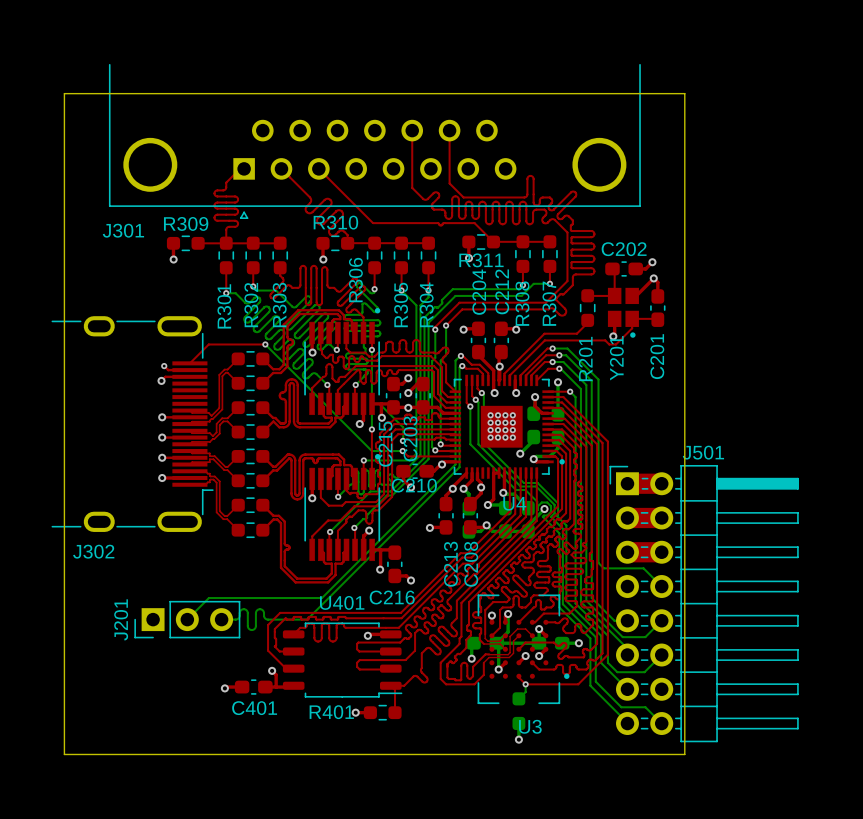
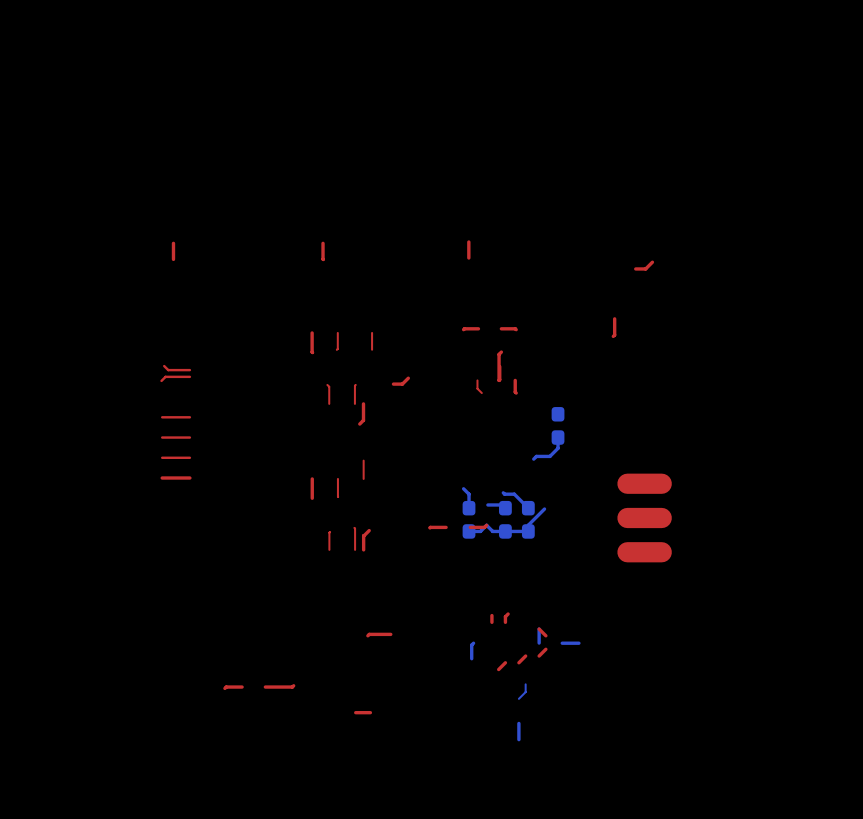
board edge: (64, 93) (684, 93) (684, 754) (64, 754) (64, 93) -> none
top track: (412, 130) (412, 187) (424, 199) (434, 192) (438, 192) (438, 197) (431, 207) (433, 209) (444, 210) (446, 218) (451, 216) (452, 198) (455, 196) (458, 198) (458, 215) (460, 218) (465, 216) (465, 204) (469, 201) (472, 204) (472, 216) (477, 218) (479, 203) (483, 201) (485, 204) (486, 222) (490, 223) (492, 221) (492, 204) (496, 201) (499, 204) (499, 222) (503, 224) (506, 221) (506, 204) (509, 201) (512, 204) (513, 222) (516, 224) (519, 221) (519, 204) (523, 201) (526, 204) (527, 223) (532, 222) (534, 210) (544, 209) (546, 213) (542, 218) (543, 222) (546, 223) (553, 219) (567, 232) (567, 281) (545, 302) (459, 302) (435, 326) (435, 329) -> none
top track: (449, 130) (449, 183) (463, 197) (525, 197) (527, 194) (527, 178) (530, 175) (533, 178) (533, 202) (535, 205) (539, 204) (541, 197) (549, 197) (552, 201) (548, 208) (552, 210) (571, 192) (575, 192) (575, 196) (557, 216) (560, 219) (567, 215) (572, 220) (571, 230) (593, 232) (592, 237) (571, 237) (571, 243) (591, 243) (594, 246) (591, 249) (571, 249) (571, 255) (591, 255) (594, 258) (591, 262) (571, 262) (571, 267) (591, 268) (594, 271) (592, 274) (574, 274) (572, 285) (556, 298) (565, 310) (563, 315) (551, 308) (462, 309) (446, 325) -> none
J301: (374, 141) -> none
top track: (244, 168) (240, 168) (226, 182) (225, 189) (216, 190) (214, 192) (216, 196) (235, 196) (237, 198) (235, 202) (217, 202) (214, 204) (216, 208) (235, 208) (237, 210) (235, 214) (217, 214) (214, 216) (216, 220) (235, 220) (237, 222) (236, 226) (226, 228) (226, 243) -> none
top track: (281, 168) (310, 198) (310, 202) (305, 208) (307, 212) (312, 212) (325, 199) (330, 200) (330, 205) (317, 218) (318, 224) (323, 223) (337, 210) (342, 211) (342, 216) (329, 229) (329, 232) (333, 235) (339, 230) (343, 231) (347, 235) (347, 243) -> none
top track: (318, 168) (373, 223) (437, 223) (440, 225) (443, 223) (474, 223) (493, 241) -> none
R311: (481, 241) -> none
top track: (493, 241) (549, 241) -> none
R309: (185, 243) -> none
top track: (198, 243) (280, 243) -> none
R310: (335, 243) -> none
top track: (347, 243) (428, 243) -> none
R308: (522, 254) -> none
R307: (549, 254) -> none
R301: (226, 255) -> none
R302: (253, 255) -> none
R303: (280, 255) -> none
R306: (374, 255) -> none
R305: (401, 255) -> none
R304: (428, 255) -> none
via: (469, 258) -> none
via: (173, 259) -> none
via: (323, 259) -> none
via: (652, 262) -> none
top track: (522, 266) (522, 285) -> none
top track: (549, 266) (549, 283) -> none
top track: (226, 267) (226, 293) -> none
top track: (253, 267) (253, 286) -> none
top track: (280, 267) (280, 275) (283, 280) (270, 294) (270, 297) (274, 297) (287, 285) (292, 287) (299, 287) (300, 268) (303, 265) (305, 268) (305, 302) (308, 305) (311, 302) (312, 266) (316, 268) (316, 302) (318, 305) (321, 302) (323, 267) (327, 269) (327, 286) (334, 287) (338, 291) (353, 279) (356, 279) (356, 282) (337, 303) (341, 305) (360, 286) (364, 286) (364, 290) (346, 309) (348, 312) (355, 309) (363, 317) (363, 332) -> none
top track: (374, 267) (374, 289) -> none
top track: (401, 267) (401, 290) -> none
top track: (428, 267) (428, 290) -> none
top track: (612, 268) (614, 271) (614, 295) (587, 295) -> none
C202: (624, 268) -> none
via: (653, 278) -> none
bottom track: (549, 283) (533, 283) (521, 295) (455, 295) (428, 322) (428, 459) (392, 495) (386, 495) (366, 515) (365, 519) (363, 519) (354, 527) -> none
via: (549, 283) -> none
bottom track: (522, 285) (518, 289) (452, 289) (442, 300) (442, 303) (438, 307) (434, 307) (424, 317) (424, 457) (390, 491) (370, 491) (330, 531) -> none
via: (522, 285) -> none
bottom track: (253, 286) (257, 290) (276, 290) (293, 307) (306, 296) (309, 296) (310, 301) (286, 324) (286, 328) (291, 329) (314, 305) (317, 305) (319, 309) (295, 333) (294, 336) (299, 337) (323, 314) (326, 313) (327, 318) (303, 344) (308, 346) (334, 321) (336, 326) (317, 347) (321, 349) (329, 344) (336, 349) -> none
via: (253, 286) -> none
bottom track: (374, 289) (374, 291) (371, 293) (360, 283) (356, 284) (377, 307) (377, 311) (374, 311) (364, 303) (361, 314) (346, 314) (344, 317) (346, 320) (377, 320) (380, 321) (378, 325) (347, 325) (344, 327) (346, 330) (377, 331) (380, 332) (378, 336) (363, 337) (365, 353) (346, 354) (347, 358) (365, 358) (367, 360) (365, 364) (347, 364) (346, 368) (363, 369) -> none
via: (374, 289) -> none
bottom track: (401, 290) (416, 305) (416, 453) (409, 460) (363, 460) -> none
via: (401, 290) -> none
bottom track: (428, 290) (428, 297) (420, 305) (420, 455) (397, 477) (388, 475) (390, 484) (380, 483) (379, 472) (376, 470) (374, 472) (374, 486) (369, 486) (369, 472) (365, 470) (363, 492) (361, 494) (358, 492) (358, 472) (354, 470) (352, 483) (338, 496) -> none
via: (428, 290) -> none
via: (226, 293) -> none
bottom track: (227, 293) (235, 293) (247, 303) (255, 297) (259, 297) (259, 302) (244, 317) (244, 321) (249, 322) (264, 307) (268, 307) (269, 311) (254, 326) (254, 330) (258, 331) (273, 316) (278, 316) (278, 321) (266, 333) (266, 338) (270, 339) (279, 330) (283, 330) (284, 334) (274, 344) (274, 348) (279, 349) (289, 339) (292, 339) (293, 344) (284, 354) (284, 358) (288, 359) (298, 349) (302, 349) (303, 353) (293, 363) (294, 367) (298, 368) (307, 359) (311, 359) (312, 363) (303, 373) (303, 376) (307, 378) (315, 373) (327, 384) -> none
top track: (632, 295) (636, 295) (653, 278) (657, 282) (657, 296) -> none
R201: (587, 308) -> none
C201: (657, 308) -> none
Y201: (623, 312) -> none
top track: (657, 319) (632, 318) (632, 328) (616, 344) (609, 344) (605, 340) (544, 340) (509, 375) (509, 380) -> none
top track: (587, 320) (587, 322) (576, 333) (544, 333) (504, 373) (504, 380) -> none
bottom track: (446, 325) (446, 355) (440, 360) (440, 444) -> none
via: (446, 325) -> none
bottom track: (435, 329) (435, 357) (432, 361) (432, 447) (435, 450) -> none
via: (435, 329) -> none
via: (463, 329) -> none
via: (516, 329) -> none
top track: (320, 332) (322, 353) (326, 357) (332, 354) (333, 360) (335, 362) (339, 356) (343, 357) -> none
top track: (329, 332) (332, 329) (332, 320) (340, 319) (337, 313) (299, 313) (287, 326) (287, 337) (292, 342) (287, 347) (287, 366) (280, 372) (273, 372) (262, 383) -> none
top track: (346, 332) (346, 348) (350, 352) (365, 352) (369, 356) (374, 356) (378, 352) (384, 351) (388, 341) (392, 343) (393, 350) (397, 352) (399, 342) (402, 339) (405, 341) (406, 349) (408, 352) (412, 351) (413, 342) (416, 339) (419, 341) (419, 349) (422, 352) (437, 353) (443, 347) (446, 347) (448, 351) (442, 359) (446, 364) (446, 382) (455, 391) -> none
top track: (354, 332) (351, 329) (351, 320) (343, 319) (343, 315) (338, 310) (298, 310) (283, 324) (283, 364) (279, 369) (273, 369) (262, 358) -> none
via: (613, 336) -> none
C204: (478, 340) -> none
C212: (501, 340) -> none
top track: (265, 344) (208, 344) (189, 363) -> none
bottom track: (265, 344) (371, 451) (402, 451) -> none
via: (265, 344) -> none
top track: (552, 348) (547, 348) (520, 375) (520, 380) -> none
bottom track: (552, 348) (567, 348) (598, 379) (598, 562) (603, 568) (643, 568) (661, 586) -> none
via: (552, 348) -> none
via: (336, 349) -> none
bottom track: (371, 349) (371, 429) -> none
via: (371, 349) -> none
via: (312, 352) -> none
top track: (478, 352) (478, 355) (493, 370) (494, 393) -> none
top track: (460, 355) (471, 364) (479, 364) (488, 373) (488, 380) -> none
bottom track: (460, 355) (455, 360) (455, 464) (322, 598) (208, 598) (187, 619) -> none
via: (460, 355) -> none
top track: (559, 355) (546, 355) (526, 375) (526, 380) -> none
bottom track: (559, 355) (566, 355) (591, 380) (591, 598) (614, 620) (627, 620) -> none
via: (559, 355) -> none
top track: (343, 357) (343, 366) (346, 368) (348, 367) (349, 358) (351, 356) (357, 362) (361, 356) (366, 360) (377, 360) (381, 356) (430, 356) (442, 367) (442, 391) (448, 397) (455, 397) -> none
top track: (238, 358) (219, 374) (219, 408) (211, 415) -> none
part: (250, 358) -> none
part: (342, 361) -> none
top track: (552, 362) (544, 362) (531, 375) (531, 380) -> none
bottom track: (552, 362) (563, 362) (586, 384) (586, 600) (622, 637) (645, 637) (661, 620) -> none
via: (552, 362) -> none
via: (164, 366) -> none
top track: (462, 366) (466, 368) (477, 368) (482, 373) (482, 380) -> none
bottom track: (462, 366) (459, 367) (459, 467) (307, 619) (267, 619) (264, 617) (263, 610) (259, 609) (256, 611) (255, 626) (252, 629) (248, 627) (247, 612) (244, 609) (240, 610) (237, 619) (221, 619) -> none
via: (462, 366) -> none
via: (499, 366) -> none
top track: (559, 368) (548, 368) (536, 380) -> none
bottom track: (559, 368) (580, 388) (580, 602) (627, 648) (627, 655) -> none
via: (559, 368) -> none
bottom track: (363, 369) (367, 370) (367, 374) (355, 384) -> none
via: (408, 378) -> none
via: (161, 380) -> none
top track: (466, 380) (466, 402) (470, 406) -> none
top track: (472, 380) (472, 396) (475, 399) -> none
bottom track: (558, 382) (558, 414) -> none
via: (558, 382) -> none
top track: (238, 383) (225, 372) (222, 376) (222, 409) (209, 421) (192, 421) (189, 424) -> none
part: (250, 383) -> none
via: (327, 384) -> none
via: (355, 384) -> none
top track: (423, 384) (417, 384) (408, 393) -> none
top track: (548, 391) (570, 391) -> none
bottom track: (570, 391) (575, 397) (575, 603) (607, 635) (607, 662) (617, 672) (644, 672) (661, 655) -> none
via: (570, 391) -> none
via: (408, 393) -> none
bottom track: (481, 393) (483, 395) (483, 442) (523, 482) (537, 482) (558, 503) (556, 515) (566, 525) (566, 601) (601, 635) (601, 662) (627, 689) -> none
via: (481, 393) -> none
via: (494, 393) -> none
via: (516, 393) -> none
C215: (393, 395) -> none
C203: (423, 395) -> none
top track: (535, 397) (535, 406) (542, 413) (548, 413) -> none
via: (535, 397) -> none
top track: (548, 397) (563, 397) (607, 441) (607, 654) (578, 684) (525, 684) (518, 676) -> none
bottom track: (475, 399) (478, 402) (478, 444) (520, 486) (536, 486) (554, 504) (554, 513) (550, 516) (562, 528) (562, 604) (595, 637) (595, 681) (621, 707) (645, 707) (661, 723) -> none
via: (475, 399) -> none
top track: (455, 402) (446, 402) (437, 393) (437, 370) (433, 366) (355, 366) (344, 376) (340, 377) (338, 381) (335, 381) (332, 378) (332, 366) (329, 364) (326, 366) (325, 375) (312, 388) (312, 403) -> none
top track: (548, 402) (562, 402) (602, 442) (602, 653) (595, 660) (590, 659) (587, 661) (588, 666) (586, 669) (578, 669) (575, 665) (570, 665) (567, 674) (563, 673) (561, 665) (557, 665) (554, 669) (539, 669) (532, 662) -> none
top track: (320, 403) (323, 407) (323, 415) (331, 417) (328, 423) (298, 423) (297, 384) (291, 379) (287, 381) (285, 390) (279, 394) (280, 398) (285, 401) (285, 422) (280, 423) (262, 407) -> none
top track: (337, 403) (337, 390) (357, 370) (360, 371) (360, 380) (363, 383) (365, 382) (365, 372) (368, 370) (371, 371) (371, 381) (373, 383) (376, 381) (376, 372) (378, 370) (384, 376) (389, 370) (395, 374) (399, 370) (431, 370) (433, 372) (433, 396) (445, 407) (455, 407) -> none
top track: (346, 403) (343, 407) (343, 415) (335, 417) (335, 421) (330, 427) (297, 426) (294, 422) (293, 384) (291, 383) (288, 424) (285, 427) (279, 427) (273, 421) (262, 432) -> none
bottom track: (371, 403) (379, 403) (403, 427) (403, 440) -> none
top track: (372, 403) (390, 403) (393, 407) (437, 407) (443, 413) (455, 413) -> none
top track: (381, 403) (381, 417) -> none
bottom track: (470, 406) (470, 444) (516, 490) (525, 490) (537, 501) (537, 510) (541, 502) (547, 502) (551, 506) (551, 511) (542, 516) (559, 533) (559, 607) (590, 638) (590, 685) (627, 723) -> none
via: (470, 406) -> none
top track: (238, 407) (227, 418) (222, 418) (216, 423) (216, 432) (213, 436) -> none
part: (250, 407) -> none
via: (408, 407) -> none
top track: (548, 407) (560, 407) (597, 444) (597, 643) (590, 650) (583, 649) (583, 653) -> none
top track: (189, 410) (192, 412) (208, 412) (211, 415) -> none
via: (490, 415) -> none
via: (498, 415) -> none
via: (505, 415) -> none
via: (512, 415) -> none
via: (162, 417) -> none
via: (381, 417) -> none
top track: (455, 418) (440, 418) (437, 413) (434, 413) (432, 414) (431, 419) (419, 417) (418, 419) (412, 420) (411, 415) (406, 414) (403, 418) (394, 418) (390, 422) (387, 422) (380, 433) (379, 441) (375, 444) (376, 448) (379, 450) (375, 460) (379, 464) (377, 489) (380, 491) (377, 494) (365, 494) (363, 497) (358, 498) (357, 492) (350, 494) (346, 490) (346, 478) -> none
top track: (548, 418) (564, 418) (591, 445) (591, 551) (589, 559) (593, 561) (593, 568) (591, 575) (587, 577) (584, 581) (592, 583) (593, 588) (583, 589) (581, 592) (583, 595) (592, 595) (593, 600) (583, 601) (581, 604) (583, 607) (592, 607) (592, 613) (587, 613) (585, 616) (587, 619) (592, 619) (593, 625) (584, 633) (581, 631) (581, 625) (578, 623) (575, 625) (574, 632) (566, 633) (563, 628) (567, 622) (566, 618) (558, 623) (545, 622) -> none
via: (490, 422) -> none
via: (498, 422) -> none
via: (505, 422) -> none
via: (512, 422) -> none
J302: (132, 424) -> none
via: (359, 424) -> none
top track: (455, 424) (394, 424) (384, 434) (384, 494) (376, 502) (345, 502) (342, 505) (328, 505) (320, 497) (320, 478) -> none
top track: (548, 424) (563, 424) (586, 446) (586, 541) (584, 542) -> none
part: (533, 425) -> none
U4: (507, 426) -> none
top track: (371, 429) (372, 478) -> none
via: (371, 429) -> none
top track: (455, 429) (395, 429) (388, 436) (388, 495) (377, 506) (354, 506) (340, 520) (328, 520) (312, 536) (312, 549) -> none
top track: (548, 429) (562, 429) (580, 448) (580, 480) (578, 485) (582, 486) (582, 490) (578, 491) (578, 494) (582, 496) (582, 499) (578, 500) (578, 503) (582, 505) (582, 509) (578, 510) (578, 513) (582, 515) (582, 518) (578, 519) (578, 522) (582, 524) (582, 528) (573, 530) (574, 533) (580, 535) (576, 542) (576, 548) (573, 548) (566, 542) (564, 545) (569, 551) (567, 553) (560, 549) (557, 550) (560, 556) (560, 566) (562, 571) (554, 572) (552, 575) (554, 577) (561, 577) (561, 581) (554, 581) (552, 584) (554, 586) (561, 586) (560, 598) -> none
top track: (189, 430) (192, 433) (209, 433) (212, 436) -> none
via: (490, 430) -> none
via: (498, 430) -> none
via: (505, 430) -> none
via: (512, 430) -> none
top track: (238, 432) (227, 421) (223, 421) (219, 425) (219, 433) (214, 439) (209, 441) (192, 441) (189, 444) -> none
part: (250, 432) -> none
top track: (455, 434) (398, 434) (392, 440) (392, 496) (378, 510) (373, 511) (370, 523) (366, 522) (366, 512) (364, 510) (358, 510) (351, 516) (349, 516) (337, 530) (337, 549) -> none
top track: (548, 434) (560, 434) (574, 448) (574, 452) (576, 453) (574, 459) (576, 465) (574, 470) (574, 523) (568, 529) (562, 531) (565, 536) (563, 539) (558, 536) (555, 538) (558, 543) (556, 546) (550, 544) (547, 546) (547, 560) (538, 562) (539, 566) (550, 566) (549, 571) (539, 571) (537, 574) (539, 577) (548, 577) (549, 581) (536, 582) (534, 586) (545, 588) (547, 590) (543, 595) (533, 595) (525, 607) (519, 606) (518, 597) (514, 596) (512, 606) (502, 607) (500, 610) (500, 627) (491, 635) -> none
via: (162, 437) -> none
via: (490, 437) -> none
via: (498, 437) -> none
via: (505, 437) -> none
via: (512, 437) -> none
bottom track: (533, 437) (533, 440) (520, 453) -> none
via: (402, 440) -> none
top track: (455, 440) (436, 437) (434, 439) (402, 440) -> none
top track: (548, 440) (559, 440) (570, 451) (570, 518) (566, 521) (563, 521) (559, 529) (554, 530) (554, 534) (546, 538) (546, 542) -> none
top track: (440, 444) (455, 445) -> none
via: (440, 444) -> none
top track: (548, 445) (558, 445) (566, 453) (566, 513) (559, 519) (557, 519) (552, 527) (547, 529) (544, 534) (539, 536) (539, 539) (534, 542) (536, 546) (533, 549) (529, 547) (526, 549) (529, 554) (529, 557) -> none
top track: (435, 450) (455, 451) -> none
via: (435, 450) -> none
top track: (189, 451) (192, 453) (209, 453) (209, 456) (214, 456) (225, 467) (238, 456) -> none
top track: (402, 451) (408, 456) (455, 456) -> none
via: (402, 451) -> none
top track: (548, 451) (556, 451) (562, 456) (562, 509) (469, 602) (469, 624) (467, 626) (469, 630) -> none
via: (520, 453) -> none
part: (250, 456) -> none
top track: (262, 456) (273, 466) (275, 466) (287, 454) (293, 456) (296, 495) (299, 493) (299, 459) (303, 454) (338, 454) (344, 459) (344, 465) (351, 466) (351, 475) (355, 478) -> none
top track: (548, 456) (555, 456) (558, 459) (558, 506) (461, 602) (461, 636) (459, 643) (440, 662) (440, 678) (446, 684) (474, 684) (483, 674) (483, 662) (489, 657) (509, 657) (513, 653) (513, 641) (518, 635) -> none
via: (162, 457) -> none
top track: (533, 459) (536, 461) (548, 461) -> none
via: (533, 459) -> none
via: (363, 460) -> none
top track: (455, 461) (444, 461) (433, 471) (426, 471) -> none
top track: (189, 464) (192, 462) (209, 462) (209, 459) (213, 459) (238, 480) -> none
via: (442, 464) -> none
top track: (189, 471) (205, 471) (219, 481) (219, 511) (224, 516) (227, 516) (238, 505) -> none
top track: (403, 471) (403, 479) (411, 487) -> none
C210: (415, 471) -> none
top track: (466, 473) (446, 495) (446, 504) -> none
top track: (472, 473) (472, 480) (463, 488) -> none
top track: (477, 473) (477, 479) (481, 482) (481, 493) (470, 504) -> none
top track: (499, 473) (493, 473) (493, 499) (487, 504) -> none
top track: (504, 473) (503, 492) -> none
top track: (509, 473) (509, 511) (468, 553) (460, 553) (400, 612) (280, 612) (268, 625) (268, 650) (286, 668) (293, 668) -> none
top track: (515, 473) (515, 514) (471, 557) (462, 557) (401, 618) (285, 618) (274, 629) (274, 646) (279, 651) (293, 651) -> none
top track: (520, 473) (520, 515) (472, 563) (462, 563) (398, 627) (345, 627) (342, 623) (338, 623) (336, 638) (332, 641) (329, 638) (328, 624) (322, 624) (321, 638) (319, 641) (314, 639) (314, 627) -> none
top track: (526, 473) (526, 516) (478, 564) (475, 570) (473, 569) -> none
top track: (531, 473) (531, 519) (448, 600) (450, 610) (447, 610) (441, 605) (438, 608) (443, 616) (440, 618) (435, 614) (432, 615) (432, 618) (435, 623) (434, 625) (425, 622) (427, 632) (424, 633) (419, 629) (415, 633) (415, 650) (405, 660) (359, 660) (357, 662) (357, 666) (359, 669) (390, 668) -> none
top track: (536, 473) (536, 520) (456, 600) (456, 618) (451, 625) (456, 632) (456, 635) (452, 635) (442, 626) (438, 629) (448, 641) (448, 645) (444, 645) (434, 635) (430, 636) (430, 639) (440, 651) (436, 654) (428, 647) (421, 653) (420, 670) (427, 677) (426, 681) (423, 682) (415, 675) (404, 685) (390, 685) (395, 689) (395, 712) -> none
via: (162, 478) -> none
top track: (329, 478) (332, 475) (332, 466) (340, 465) (340, 461) (337, 458) (318, 458) (315, 463) (312, 458) (303, 458) (303, 494) (298, 499) (294, 498) (291, 494) (290, 458) (277, 470) (273, 470) (262, 480) -> none
part: (250, 480) -> none
top track: (189, 484) (205, 484) (210, 479) (213, 479) (216, 482) (216, 512) (238, 530) -> none
via: (411, 487) -> none
via: (481, 487) -> none
via: (452, 488) -> none
via: (463, 488) -> none
via: (503, 492) -> none
via: (338, 496) -> none
via: (312, 498) -> none
via: (487, 504) -> none
part: (250, 505) -> none
top track: (262, 505) (273, 515) (278, 515) (284, 521) (284, 543) (289, 547) (284, 551) (284, 566) (297, 578) (326, 578) (331, 573) (331, 563) (323, 561) (323, 553) (320, 549) -> none
part: (342, 507) -> none
via: (544, 509) -> none
C213: (446, 515) -> none
C208: (470, 515) -> none
via: (486, 525) -> none
via: (354, 527) -> none
via: (429, 527) -> none
part: (250, 530) -> none
top track: (262, 530) (273, 519) (277, 519) (281, 523) (281, 567) (295, 582) (328, 582) (335, 575) (335, 563) (343, 561) (343, 553) (346, 549) -> none
via: (369, 530) -> none
via: (330, 531) -> none
top track: (546, 542) (540, 544) (543, 551) (536, 552) (532, 561) (522, 563) (524, 567) (533, 569) (533, 572) (528, 577) (530, 584) (526, 584) (516, 575) (513, 577) (526, 592) (526, 596) (522, 596) (516, 591) (511, 592) (503, 587) (501, 590) (509, 599) (506, 602) (493, 602) (485, 610) (485, 638) (487, 641) (500, 641) (505, 635) -> none
top track: (584, 542) (582, 544) (584, 546) -> none
top track: (584, 546) (586, 548) (581, 552) (573, 552) (571, 554) (574, 557) (584, 558) (585, 562) (567, 563) (565, 565) (567, 568) (580, 568) (583, 570) (581, 574) (567, 574) (565, 576) (567, 579) (577, 579) (576, 584) (567, 584) (565, 587) (567, 590) (576, 590) (576, 595) (567, 595) (565, 598) (567, 600) (575, 601) -> none
top track: (372, 549) (389, 549) (393, 553) -> none
top track: (380, 549) (380, 569) -> none
top track: (529, 557) (526, 558) (521, 554) (517, 563) (514, 562) (511, 565) (513, 569) (512, 572) (506, 570) (503, 572) (508, 579) (507, 582) (504, 582) (498, 577) (495, 580) (498, 584) (497, 587) (491, 585) (488, 587) (493, 594) (492, 597) (489, 598) (483, 592) (480, 595) (481, 611) (473, 614) (474, 617) (481, 618) (480, 622) (474, 623) (473, 625) (474, 628) (481, 628) (479, 639) (483, 644) (500, 644) (505, 649) -> none
C216: (394, 564) -> none
via: (380, 569) -> none
top track: (473, 569) (469, 568) (466, 575) (458, 574) (459, 583) (449, 582) (450, 591) (448, 593) (441, 591) (442, 598) (441, 601) (432, 599) (434, 607) (432, 609) (423, 608) (424, 618) (415, 617) (415, 626) (406, 625) (406, 629) (411, 635) (408, 638) (404, 638) (400, 642) (357, 643) (357, 649) (359, 651) (390, 651) -> none
top track: (394, 575) (406, 575) (411, 580) -> none
via: (411, 580) -> none
top track: (559, 598) (551, 596) (553, 604) (544, 609) (541, 609) (540, 601) (537, 600) (535, 606) (518, 622) -> none
top track: (575, 601) (576, 606) (569, 613) (543, 613) (535, 622) (532, 622) -> none
J501: (704, 603) -> none
bottom track: (508, 614) (508, 631) (496, 643) -> none
via: (508, 614) -> none
via: (491, 615) -> none
J201: (187, 619) -> none
top track: (314, 627) (313, 624) (308, 623) (305, 627) (300, 627) (293, 634) -> none
via: (539, 629) -> none
top track: (469, 630) (470, 635) (466, 639) (466, 647) (455, 656) (456, 660) (451, 662) -> none
via: (367, 635) -> none
top track: (532, 635) (525, 629) (517, 629) (510, 636) (510, 652) (508, 654) (487, 654) -> none
part: (485, 643) -> none
bottom track: (496, 643) (538, 643) -> none
bottom track: (496, 643) (498, 645) (498, 669) -> none
part: (550, 643) -> none
via: (578, 643) -> none
top track: (518, 649) (525, 642) (553, 642) (558, 646) (564, 642) (566, 646) (558, 654) (559, 658) (566, 655) (583, 657) (583, 653) -> none
U3: (523, 649) -> none
top track: (489, 654) (485, 654) (473, 666) (473, 676) (470, 678) (467, 676) (467, 664) (464, 662) (461, 665) (461, 680) (448, 678) (447, 664) (450, 661) (451, 662) -> none
via: (525, 656) -> none
via: (539, 656) -> none
via: (471, 658) -> none
U401: (342, 660) -> none
via: (498, 669) -> none
top track: (272, 670) (276, 674) (276, 687) -> none
via: (272, 670) -> none
via: (525, 684) -> none
C401: (253, 687) -> none
via: (224, 688) -> none
part: (518, 711) -> none
via: (355, 712) -> none
R401: (382, 712) -> none
via: (518, 739) -> none

